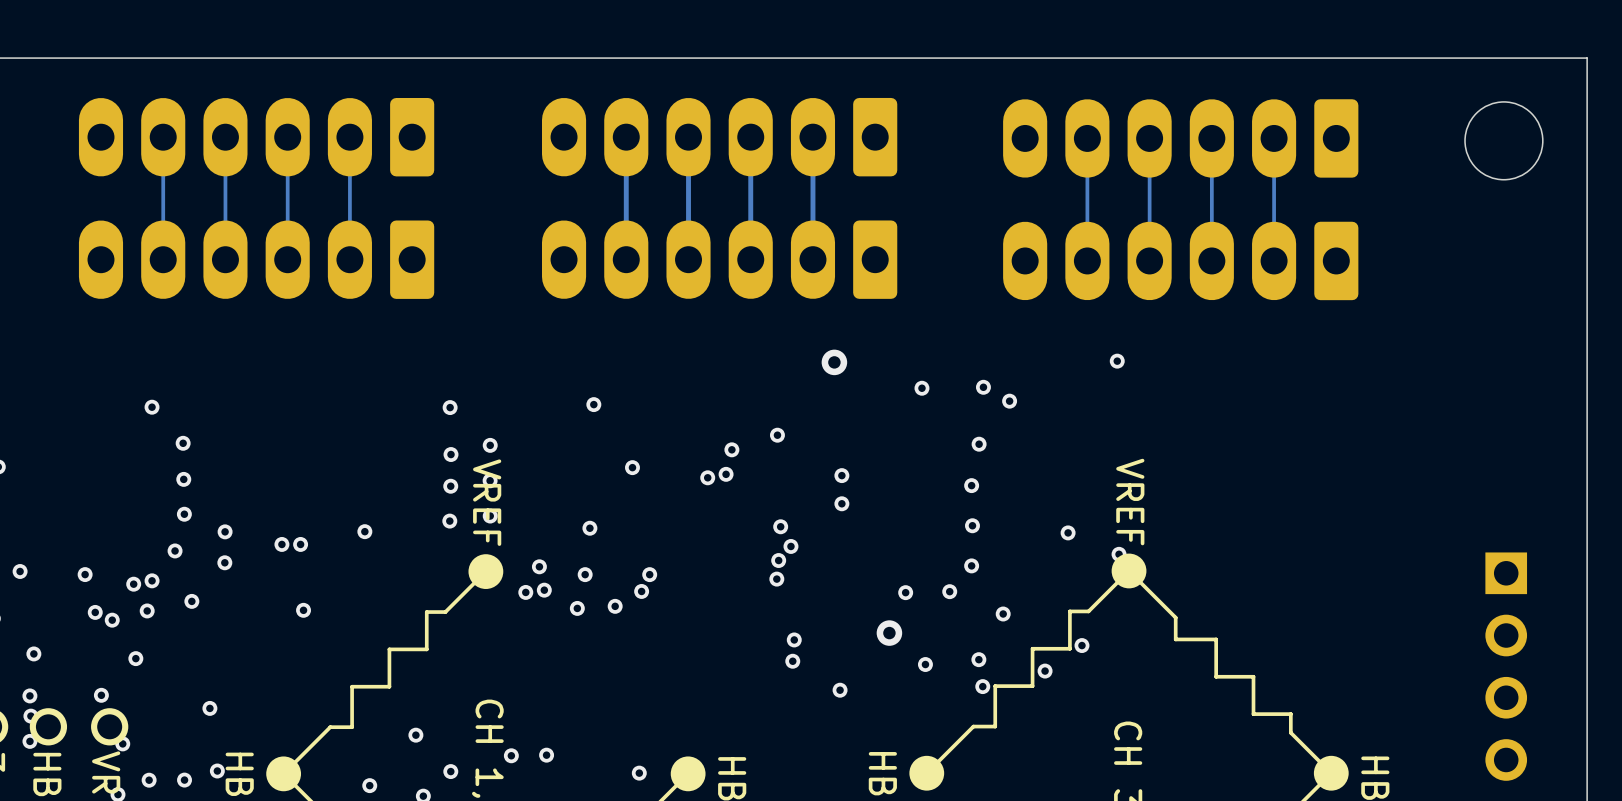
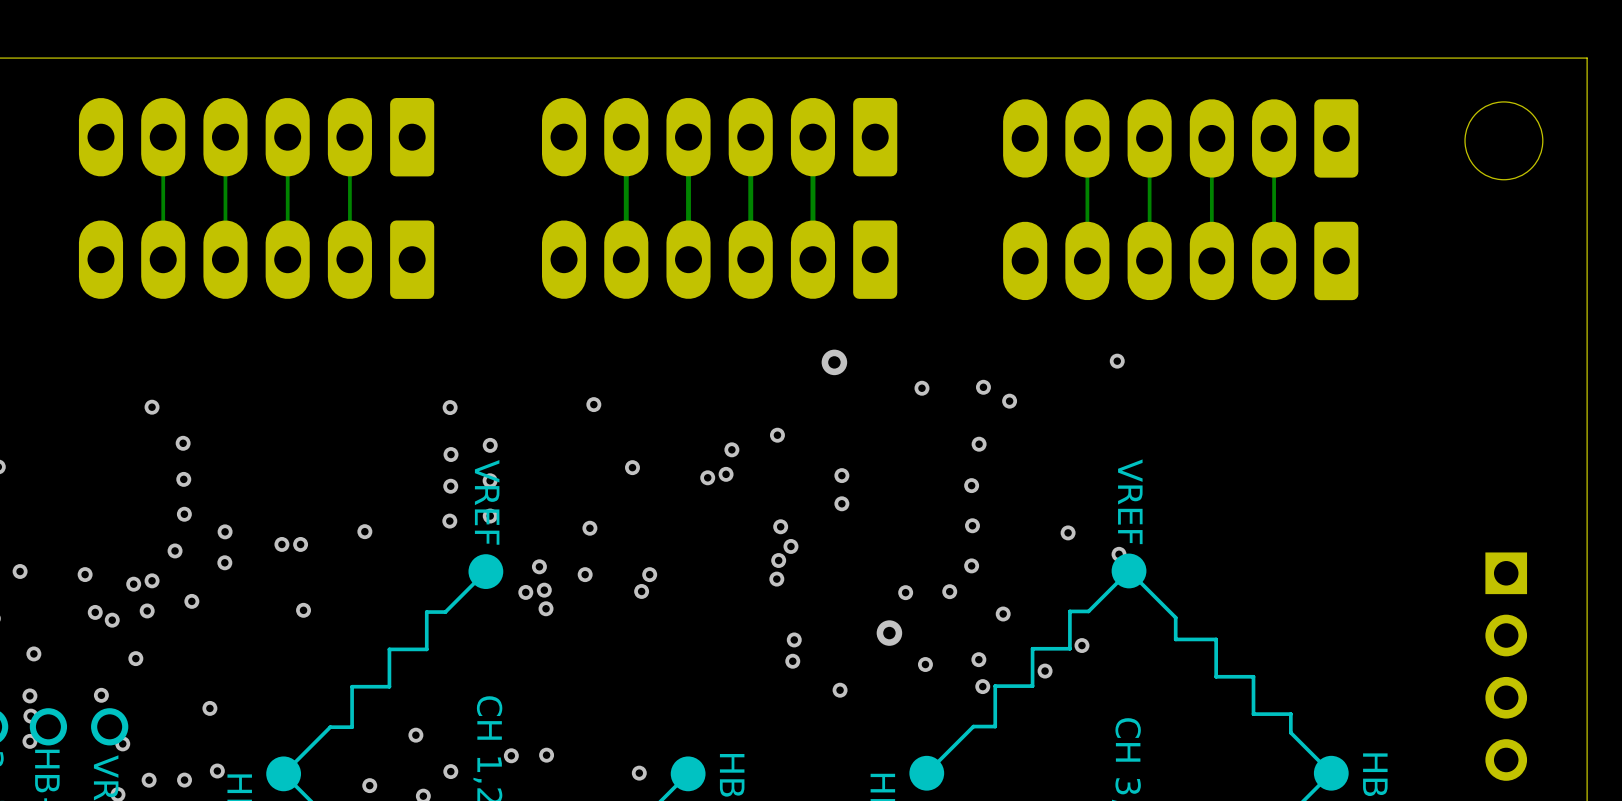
via: (615, 606) -> none
via position: (577, 608) -> (546, 608)

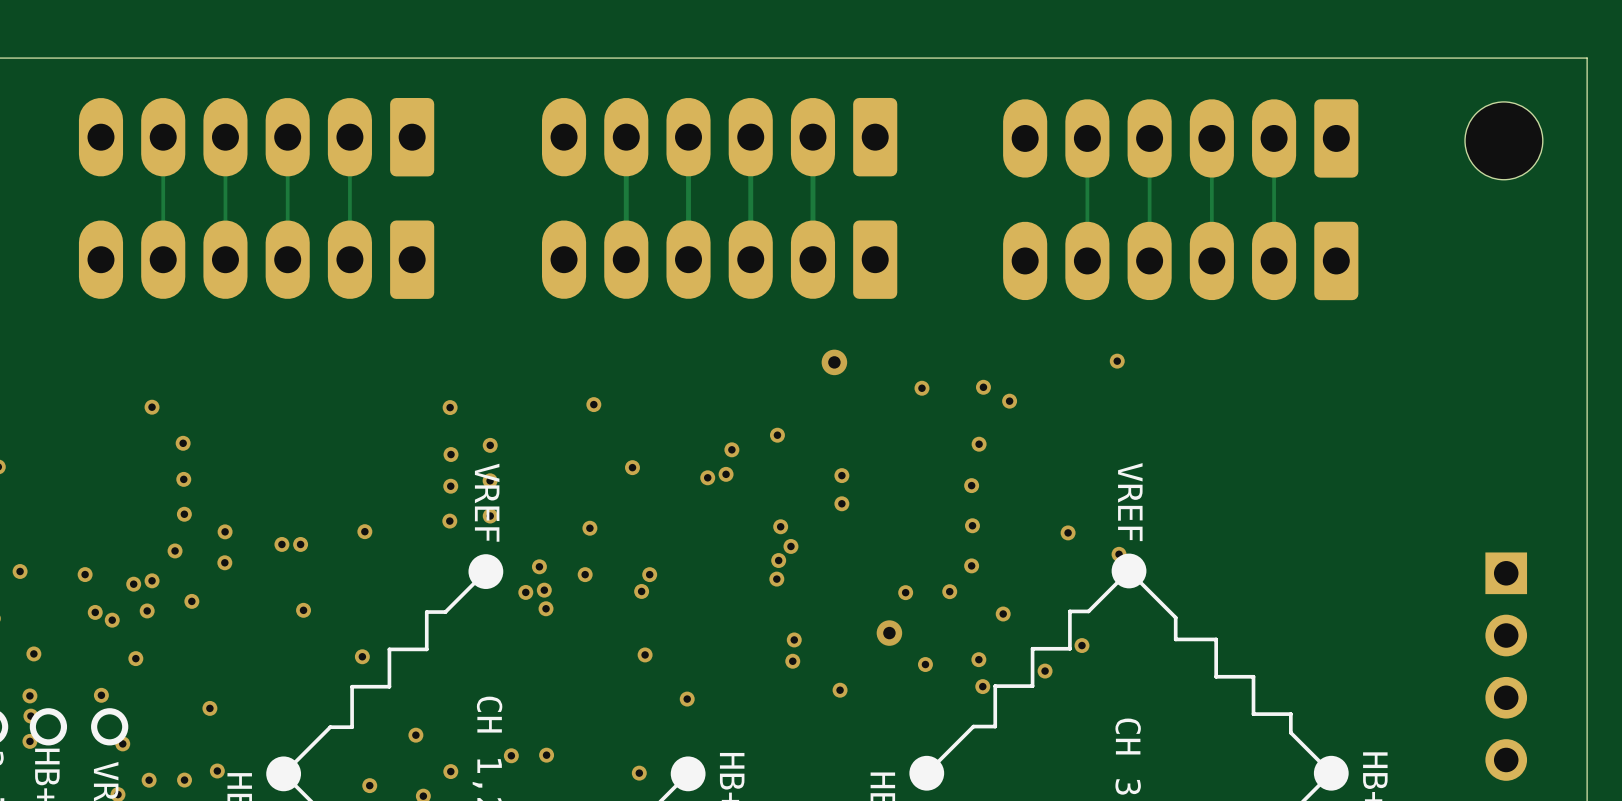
via: none -> (645, 654)
via: none -> (362, 656)
via: none -> (687, 699)

